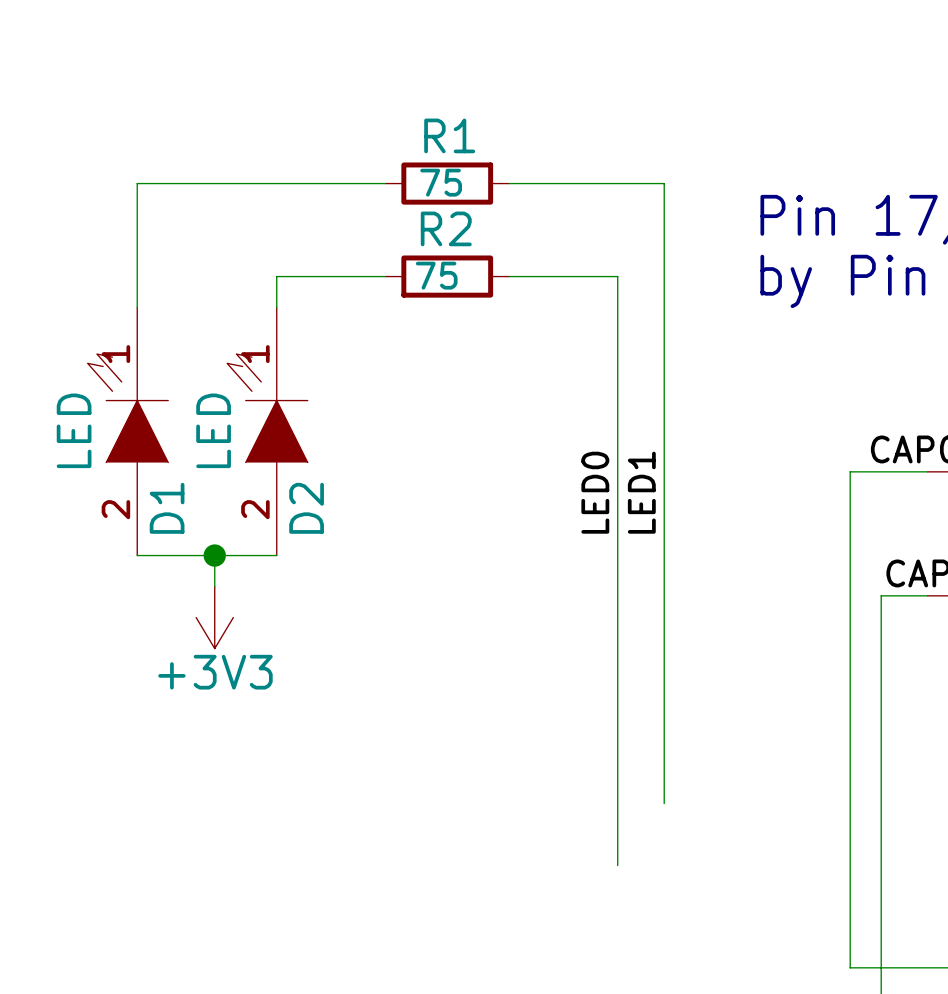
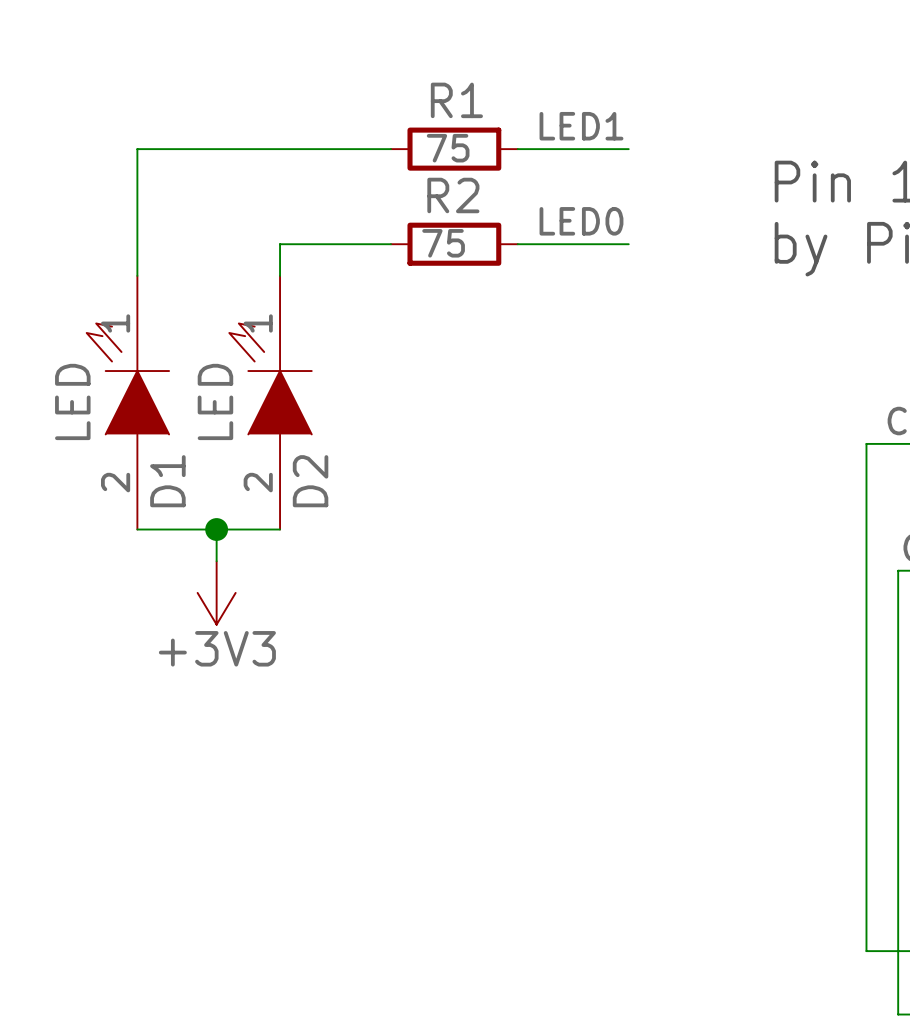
wire: (617, 183) (664, 183) (664, 803) -> none
wire: (617, 276) (617, 865) -> none
label rotation: 0° (595, 492) -> 90° clockwise (581, 221)
label position: LED0 (595, 492) -> LED0 (581, 221)
label rotation: 0° (641, 492) -> 90° clockwise (581, 126)
label position: LED1 (641, 492) -> LED1 (581, 126)

